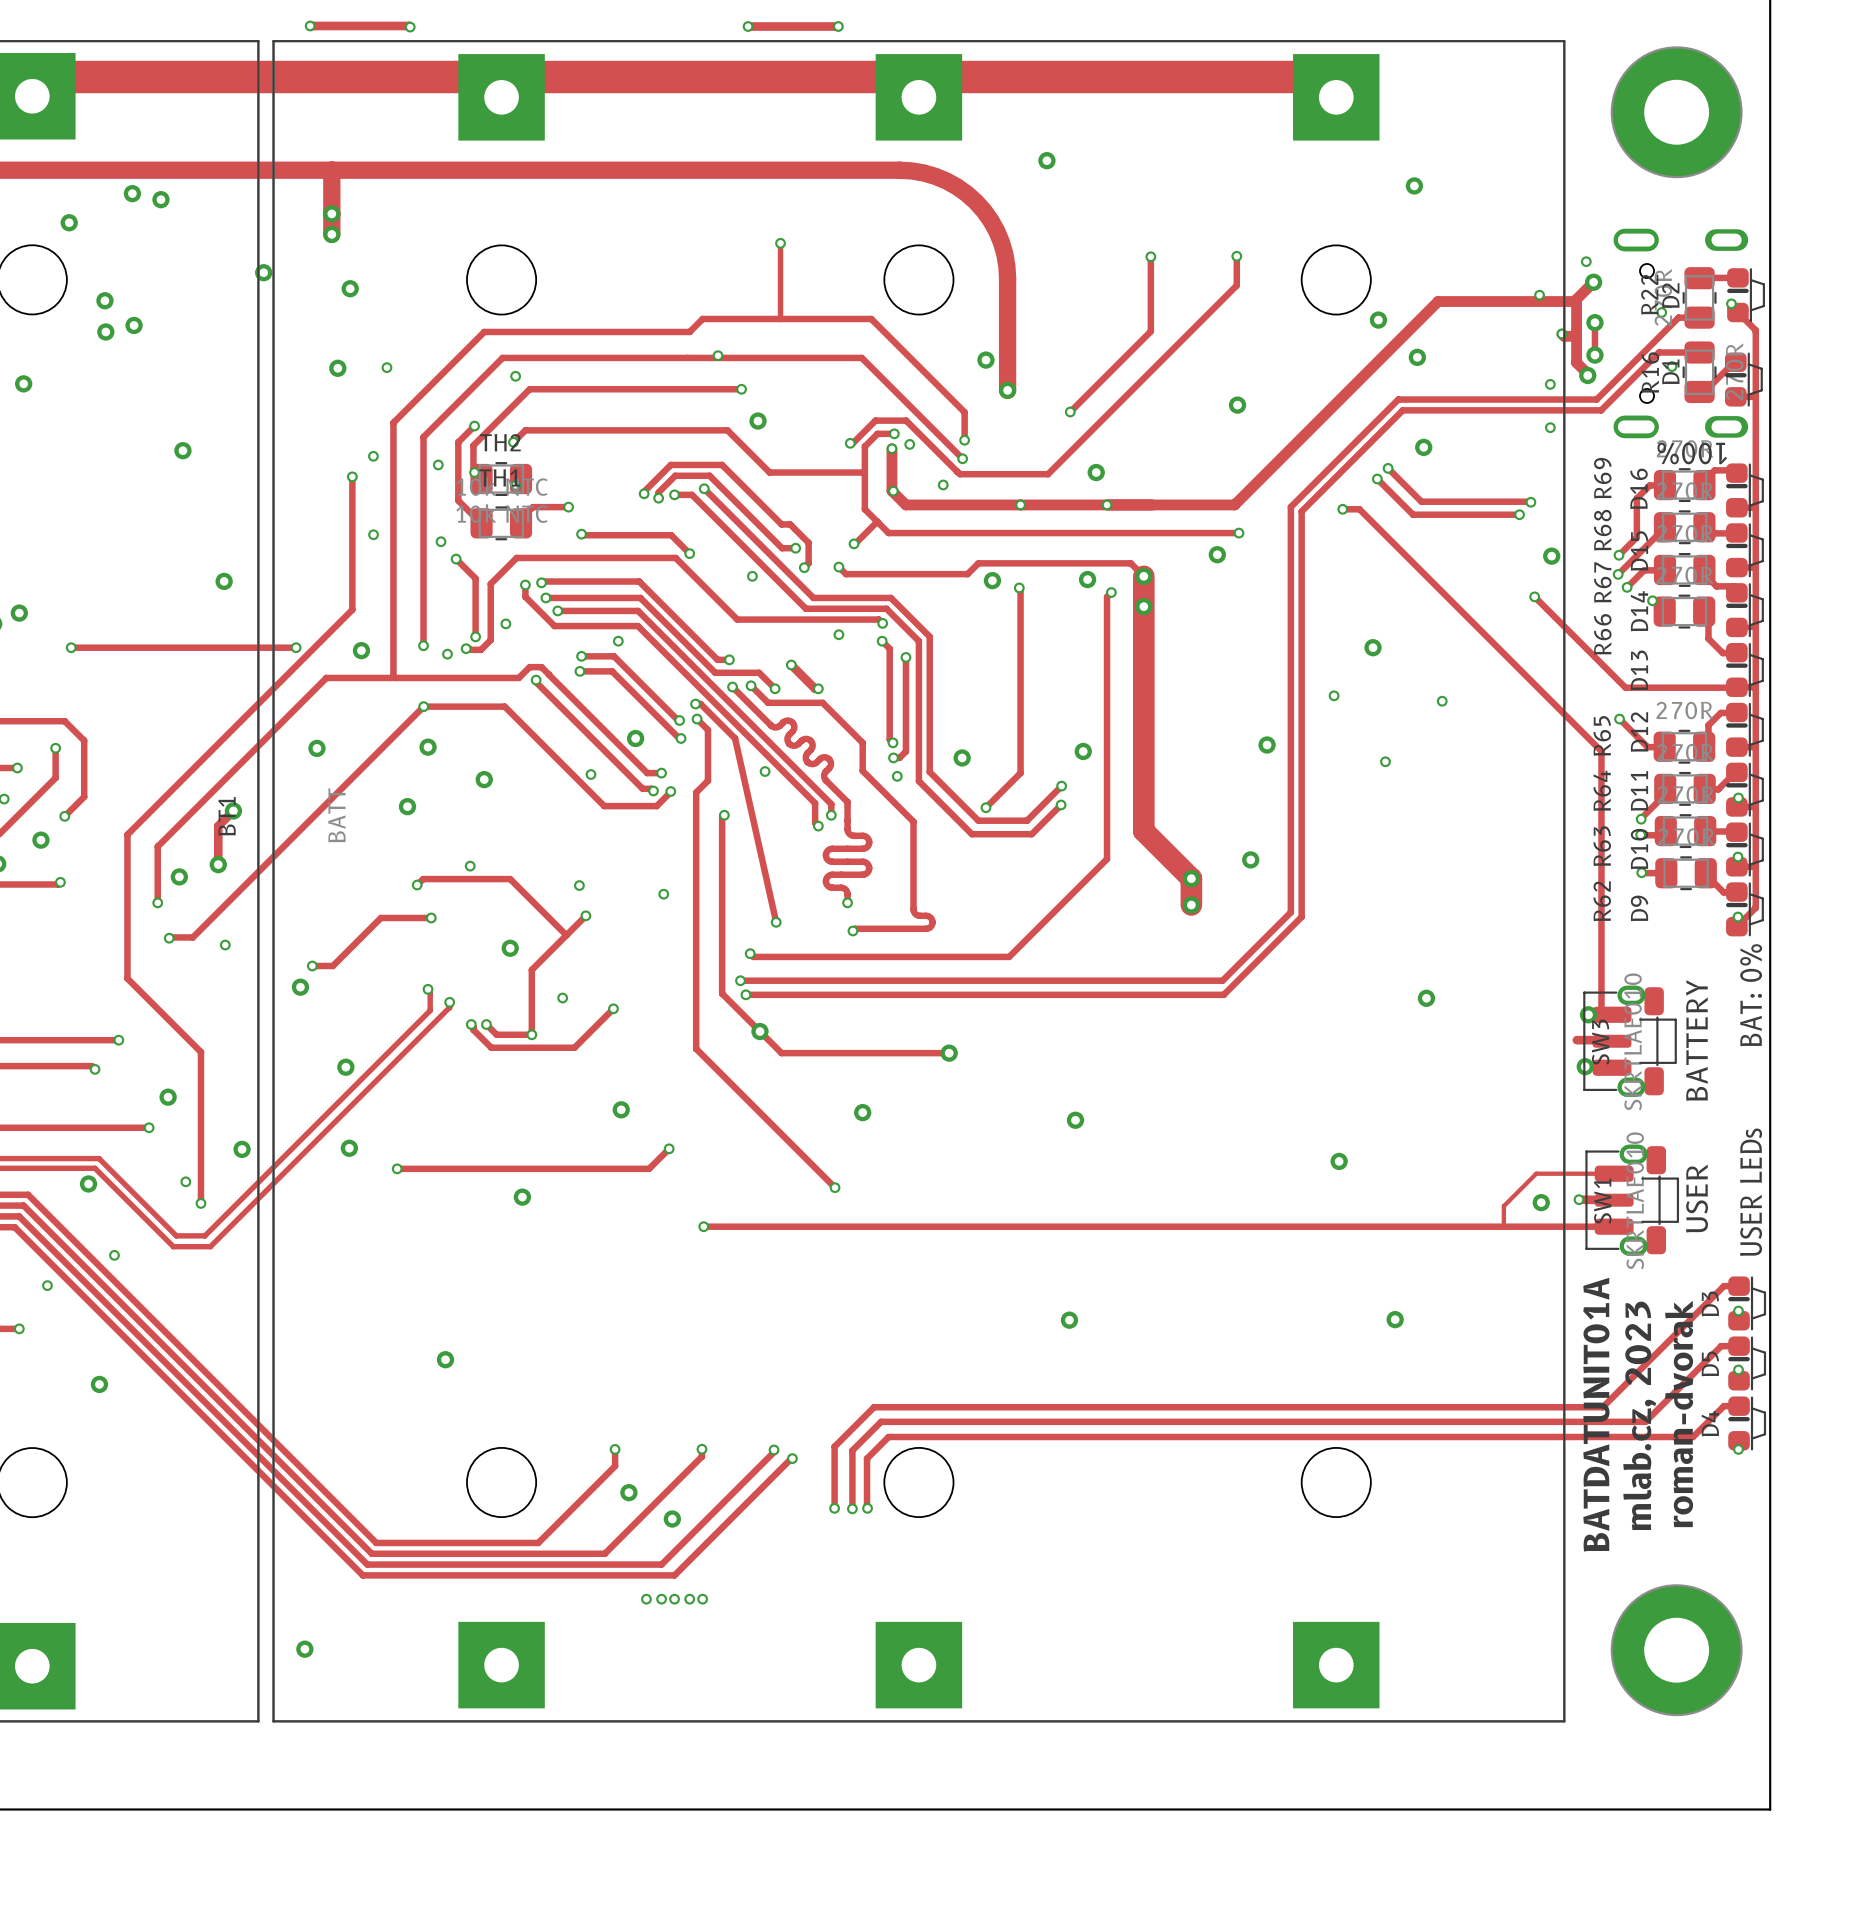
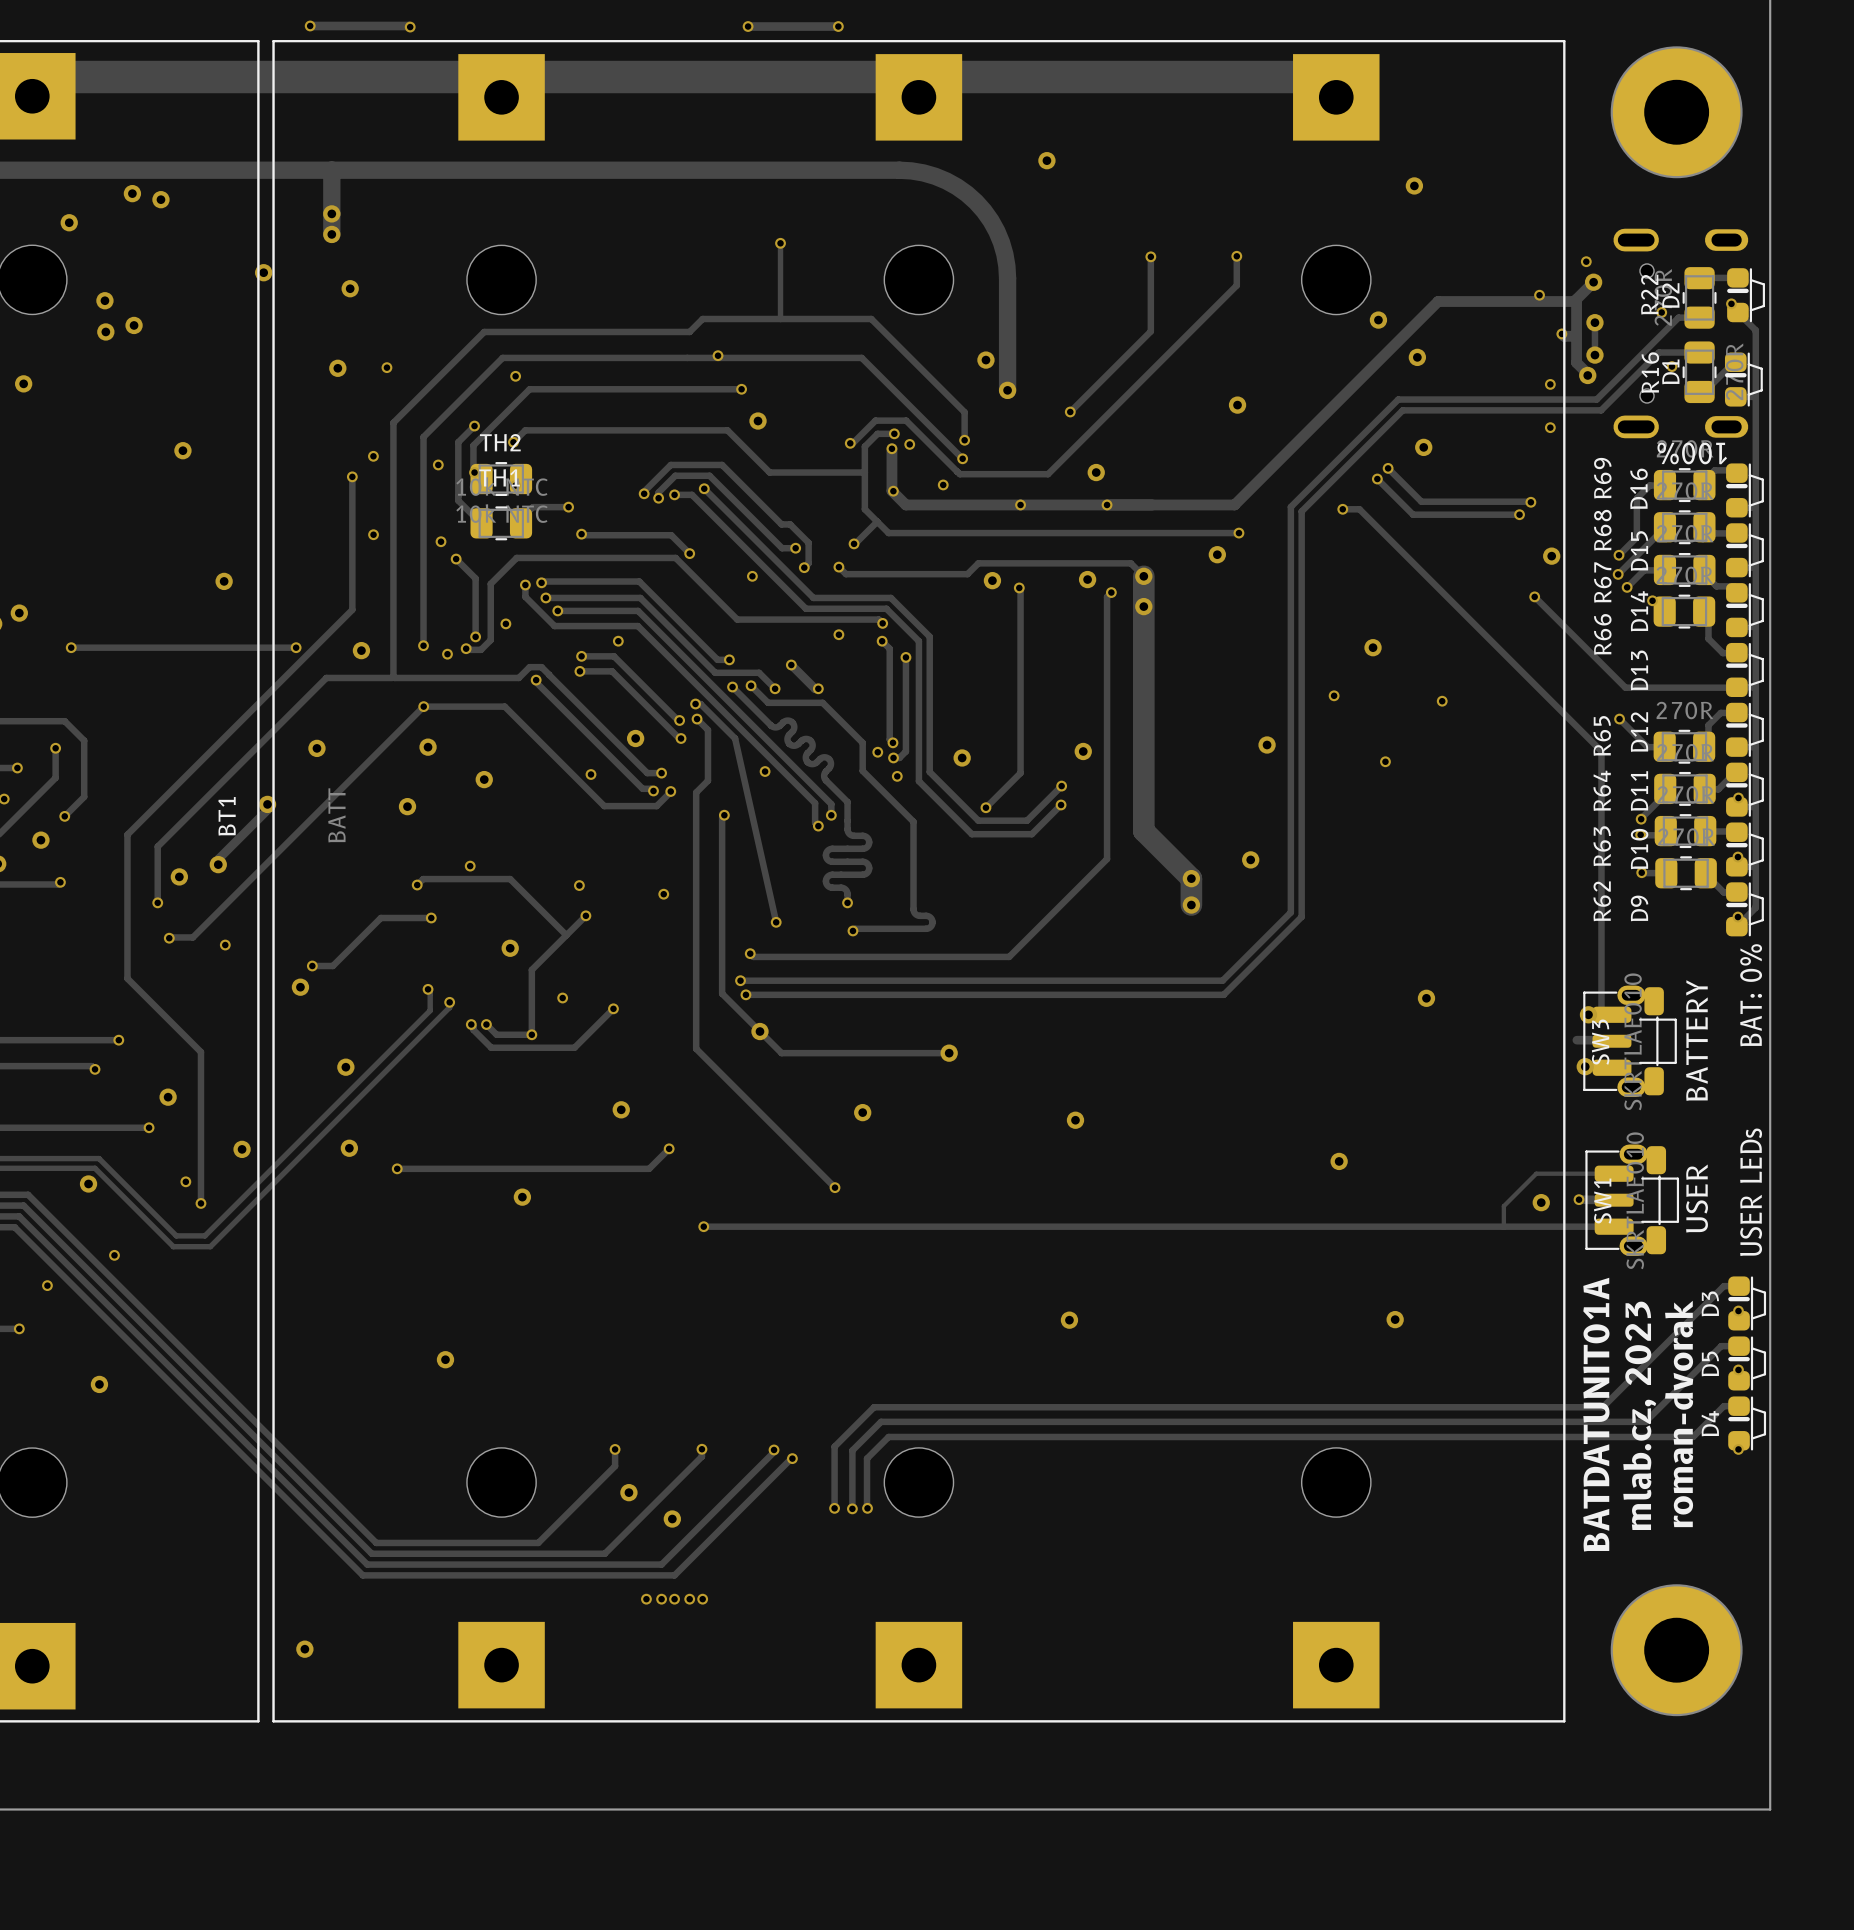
via: none -> (877, 752)
track: (233, 810) (218, 826) (218, 859) -> (267, 804) (267, 810) (218, 859)
via position: (233, 810) -> (267, 804)

